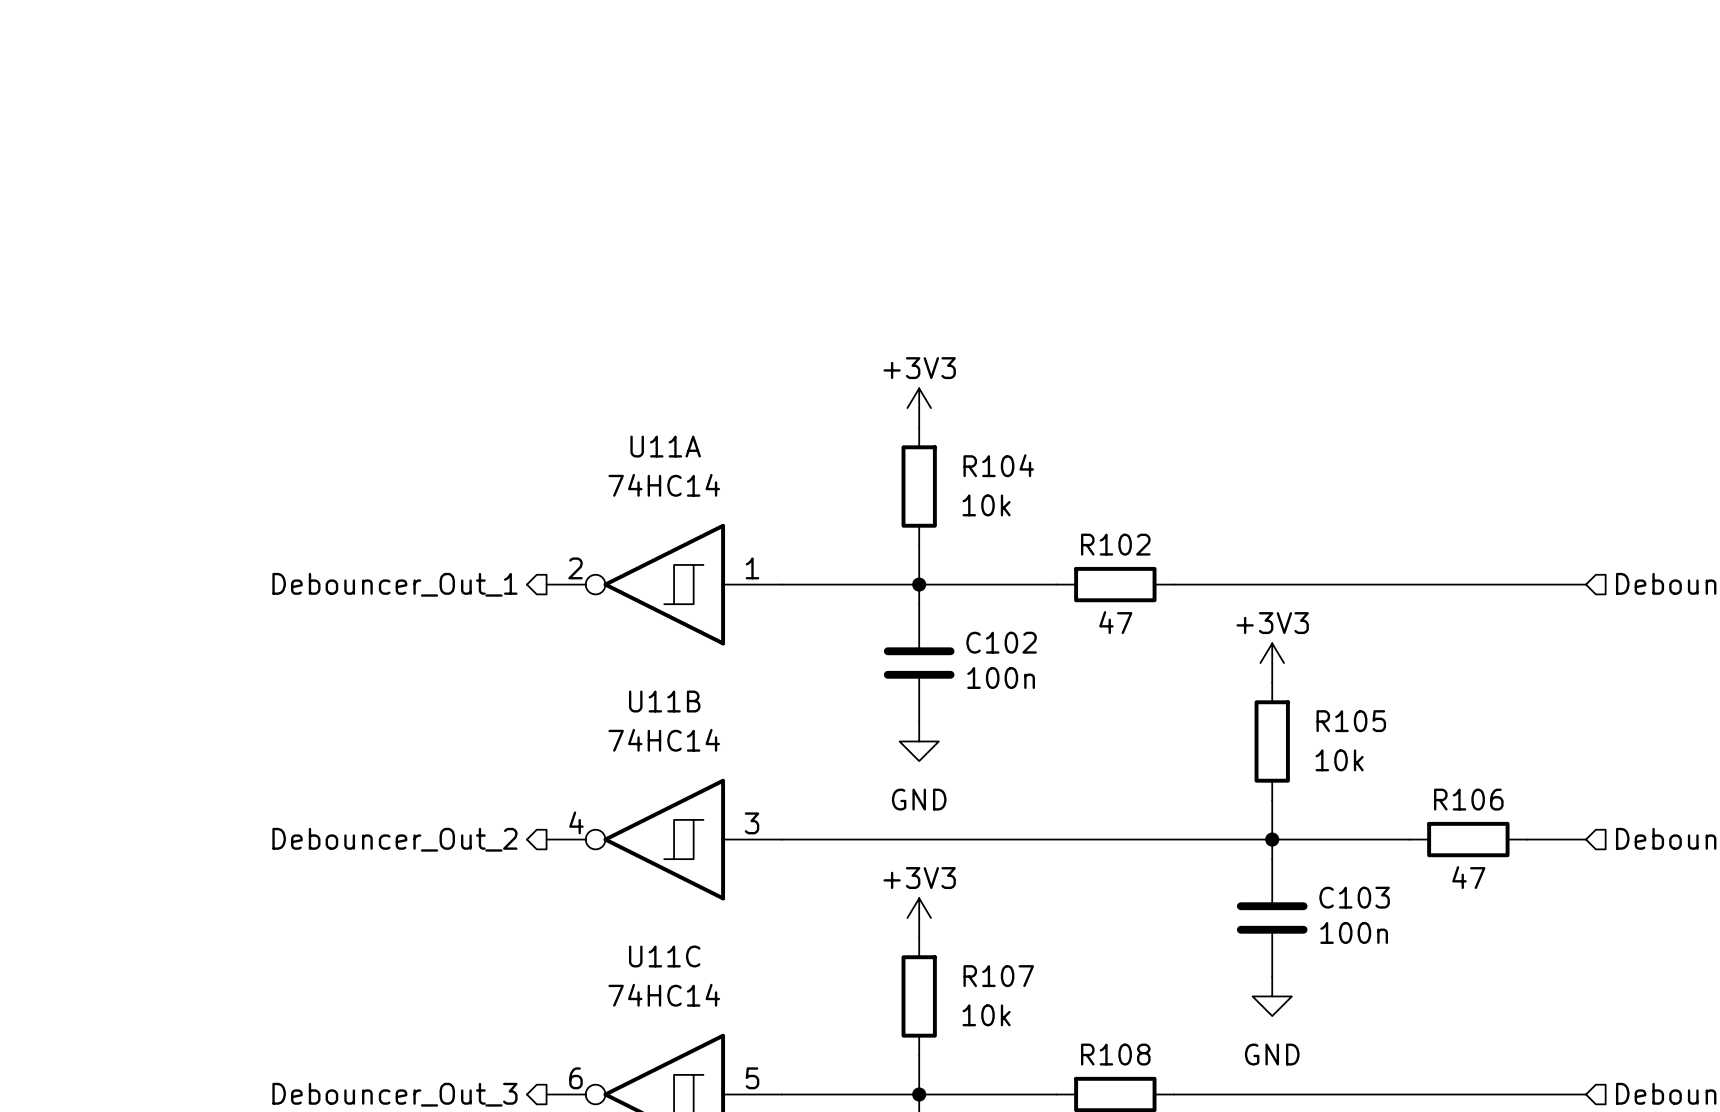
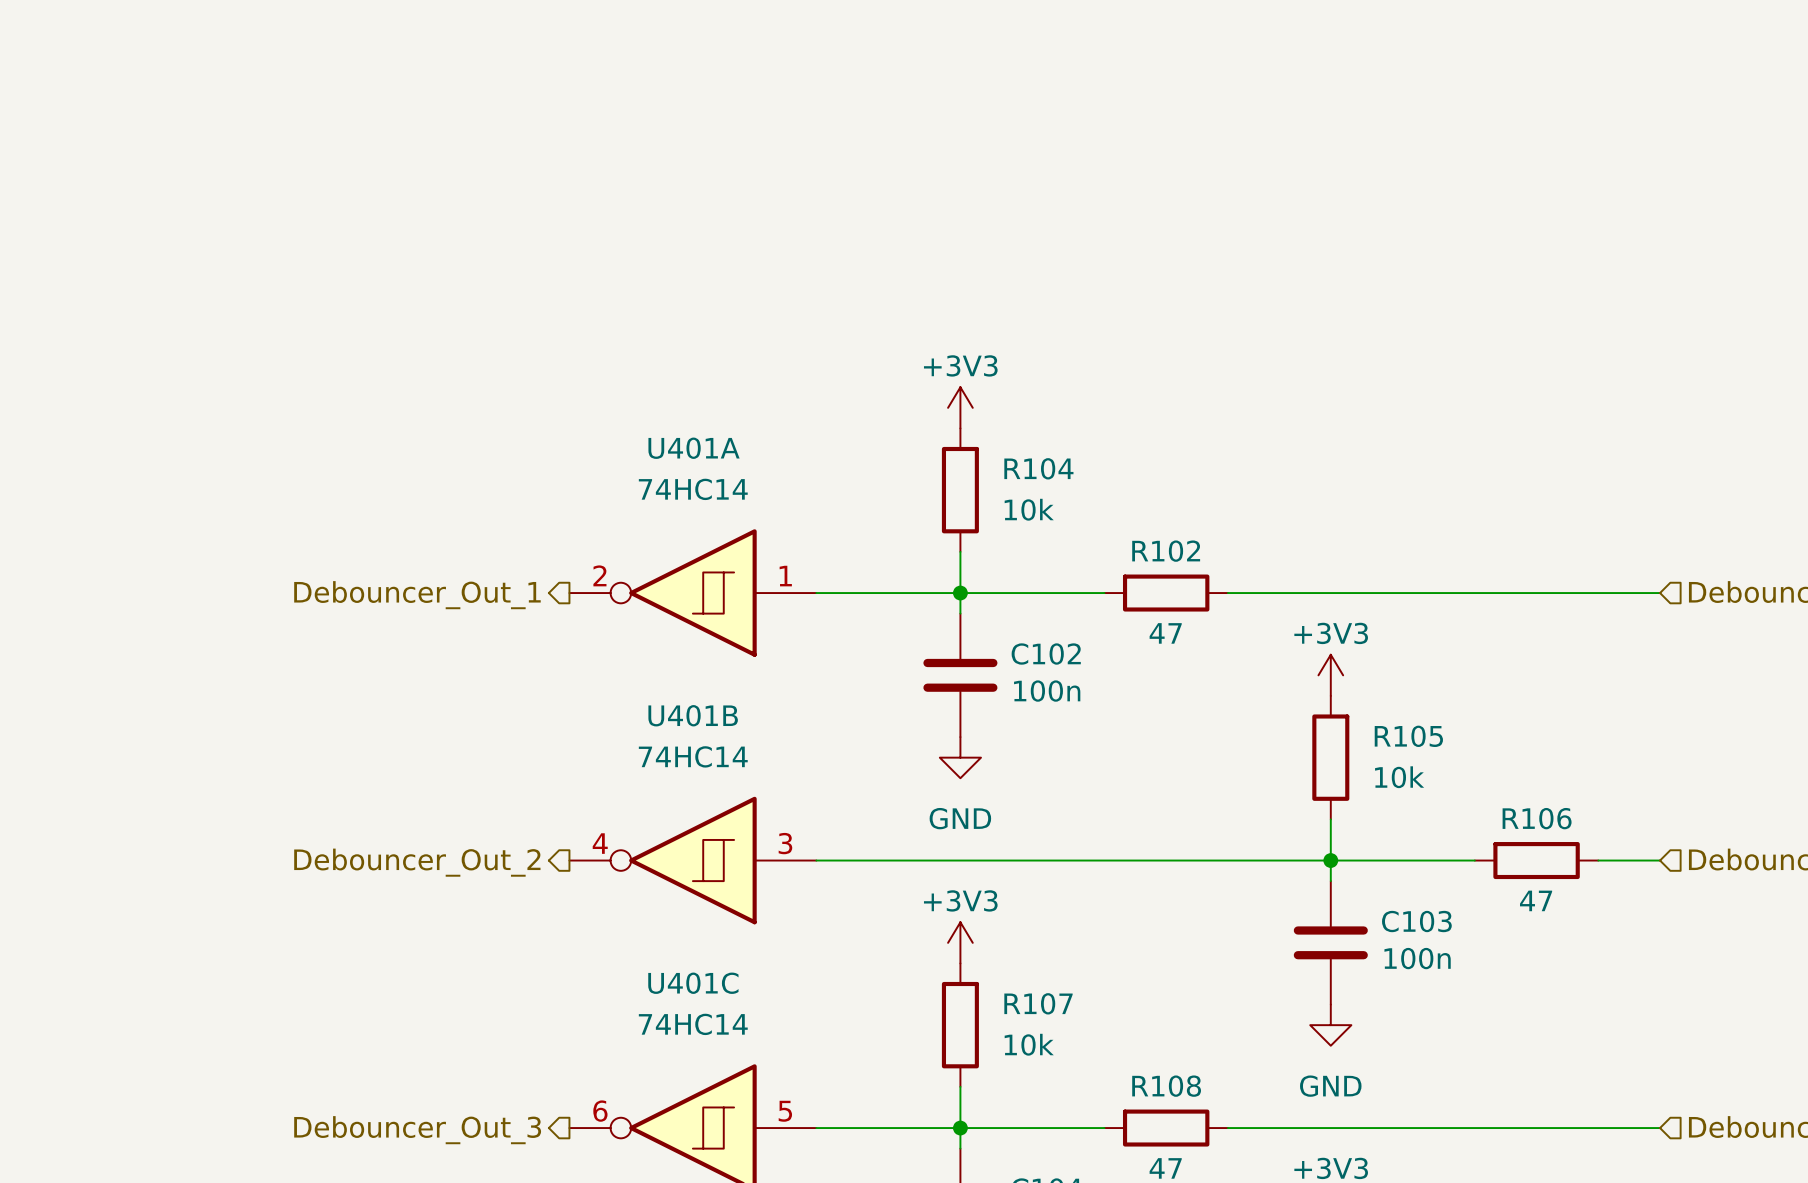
U11A name: U11A (665, 446) -> U401A (694, 448)
U11B name: U11B (664, 701) -> U401B (693, 715)
U11C name: U11C (664, 956) -> U401C (693, 983)

